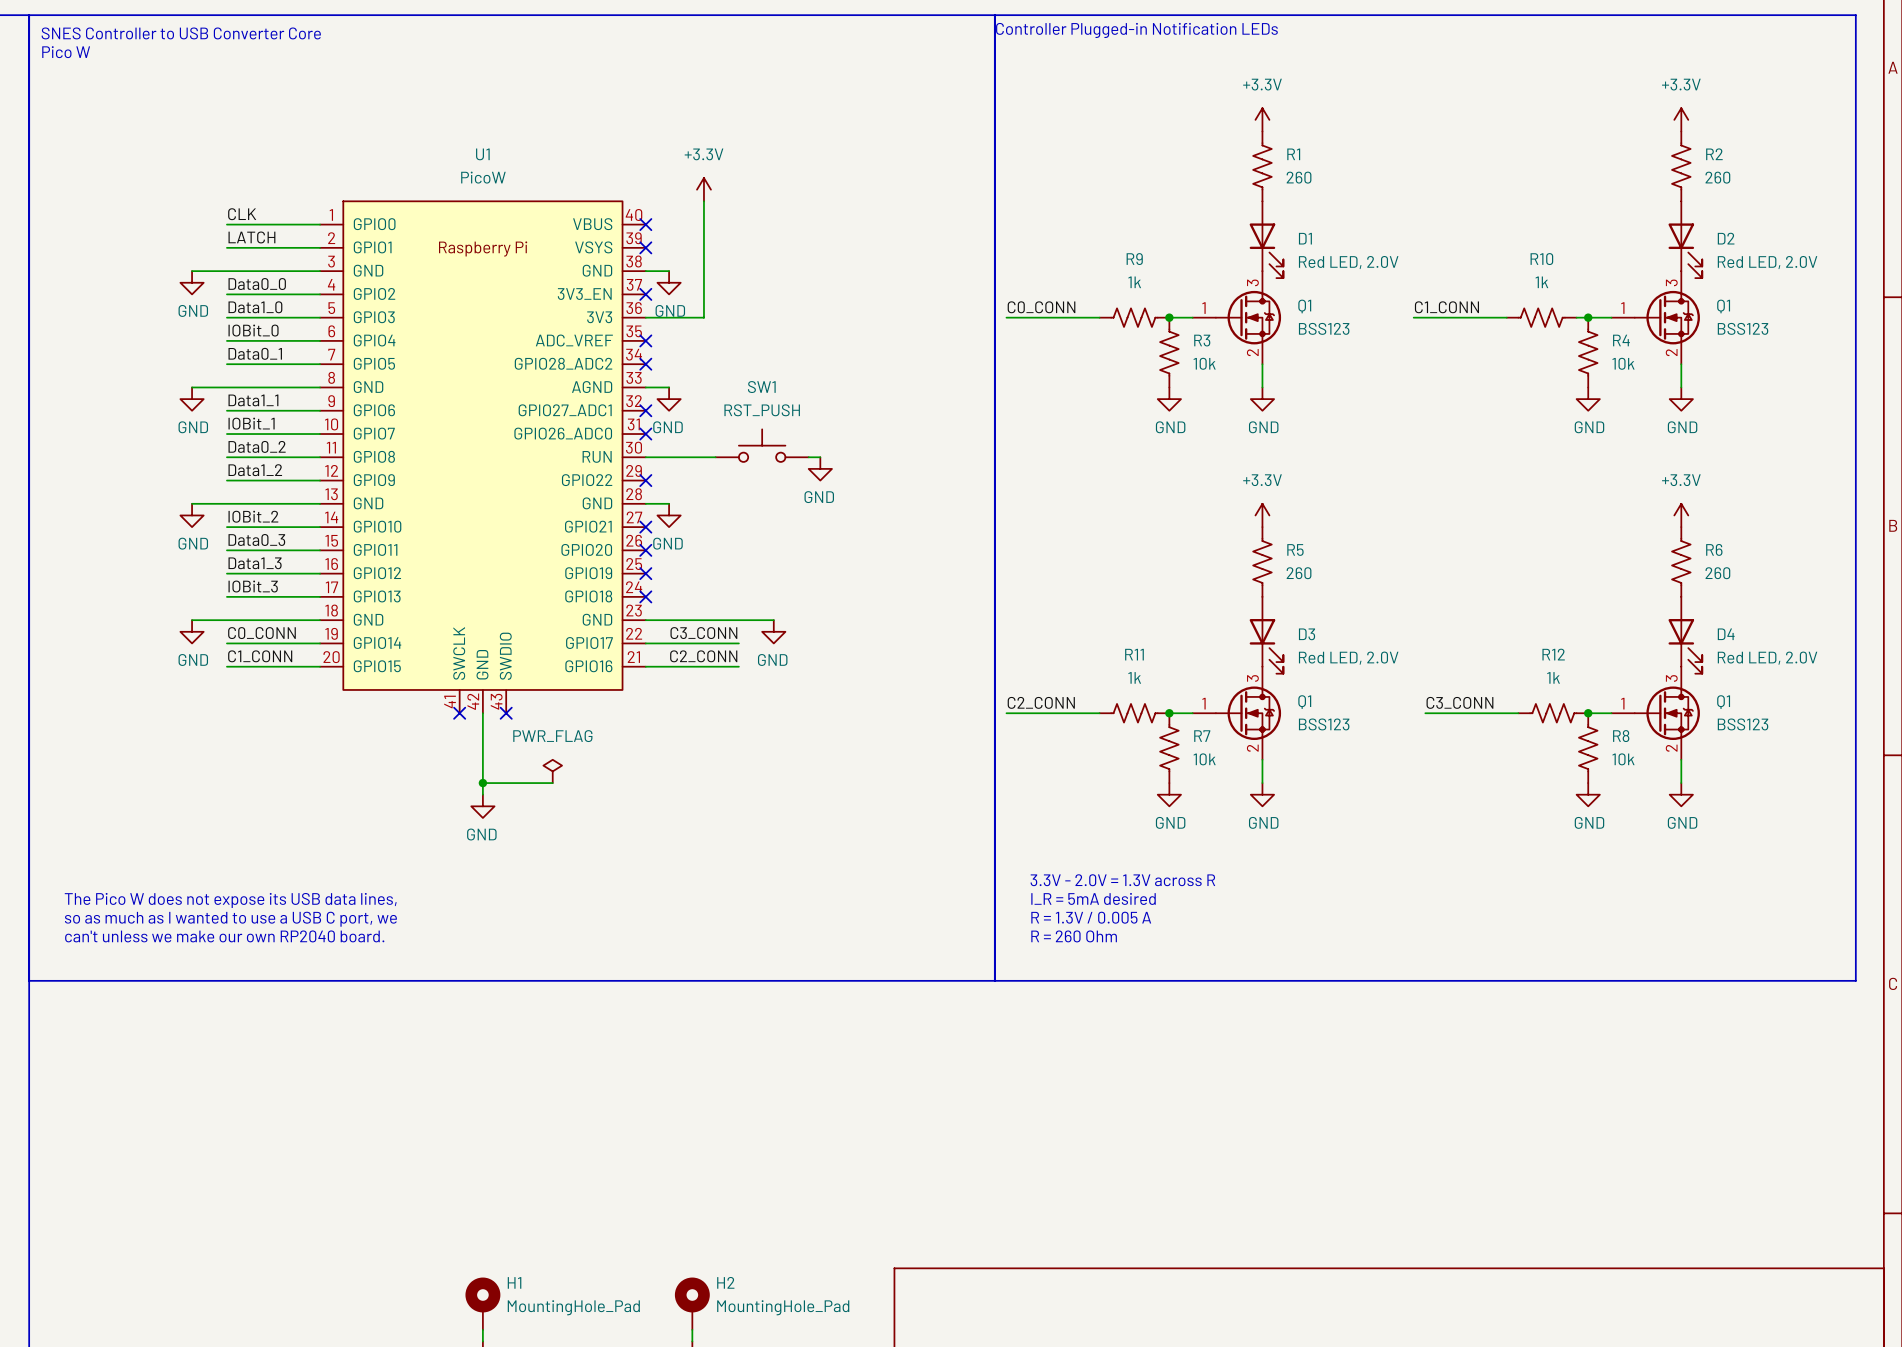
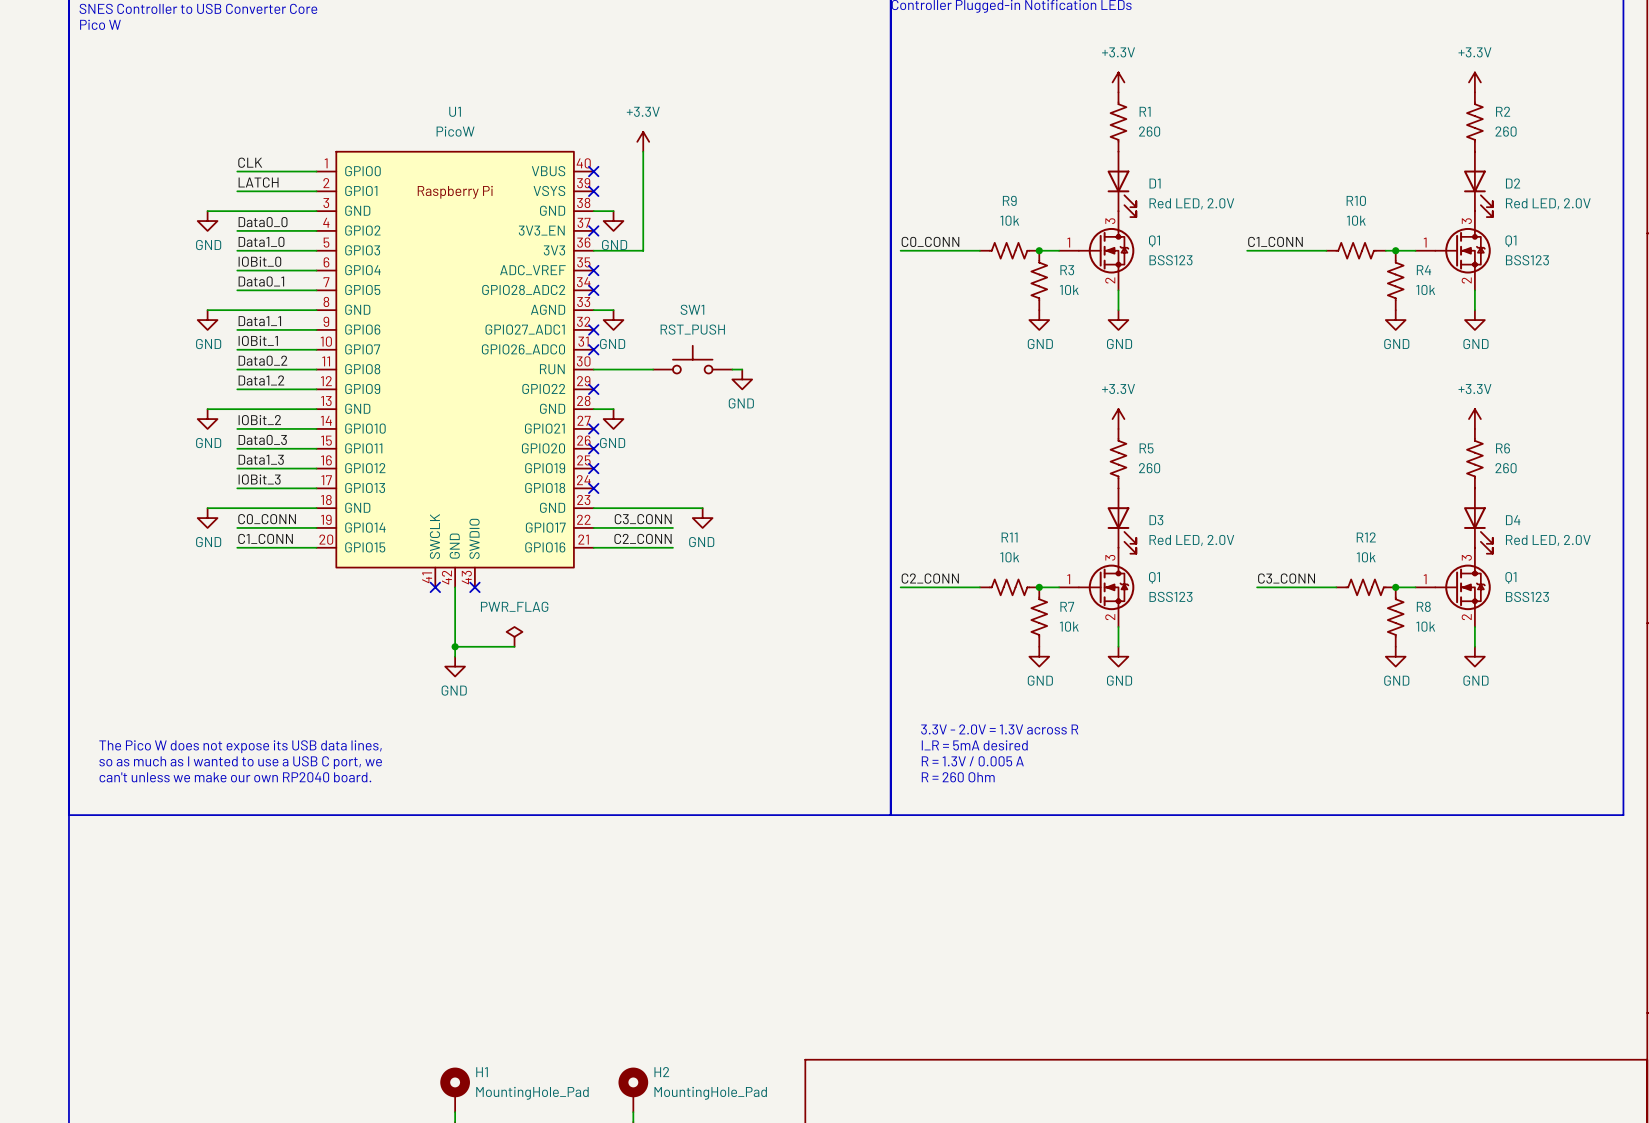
R9 value: 1k (1134, 282) -> 10k (1009, 220)
R10 value: 1k (1541, 282) -> 10k (1356, 220)
R11 value: 1k (1134, 677) -> 10k (1009, 557)
R12 value: 1k (1553, 677) -> 10k (1366, 557)

